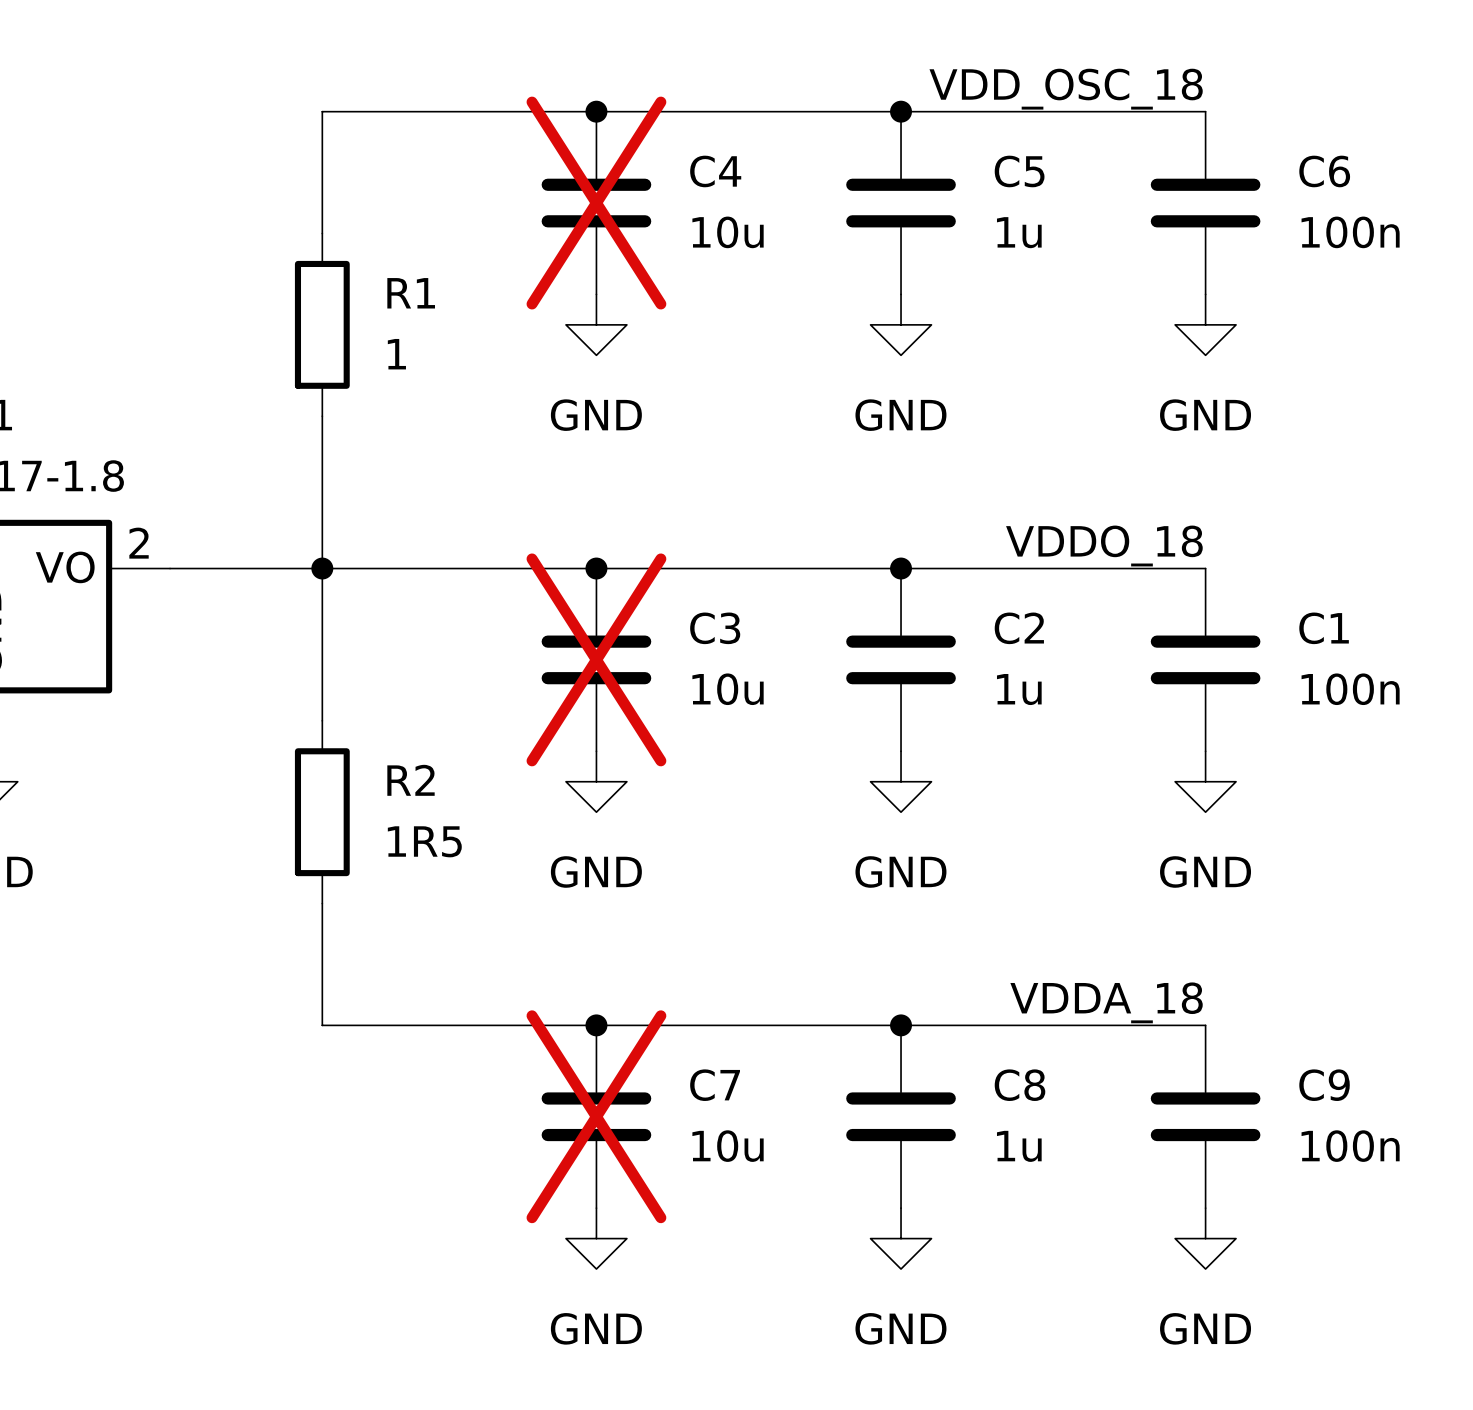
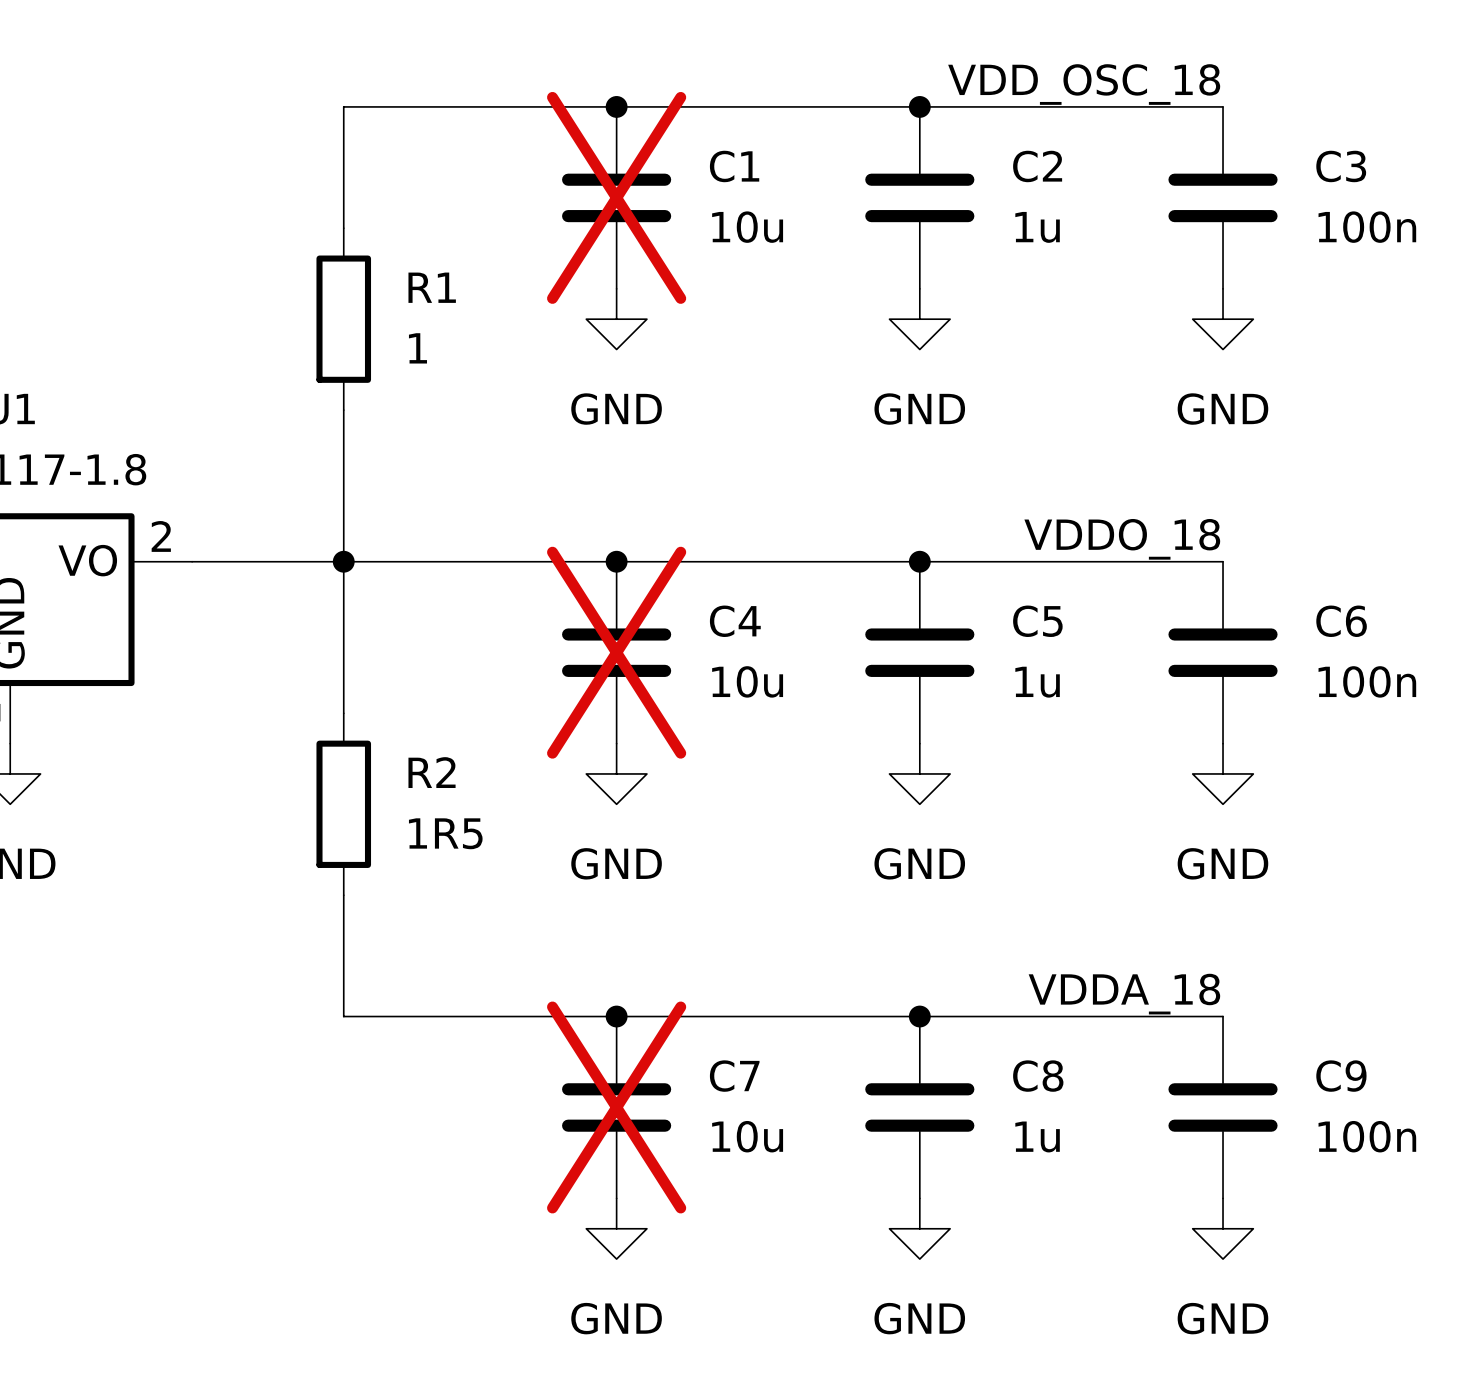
C4 name: C4 (715, 171) -> C1 (734, 166)
C5 name: C5 (1019, 171) -> C2 (1037, 166)
C6 name: C6 (1324, 171) -> C3 (1341, 166)
C3 name: C3 (715, 628) -> C4 (735, 621)
C2 name: C2 (1019, 628) -> C5 (1037, 621)
C1 name: C1 (1324, 628) -> C6 (1341, 621)

